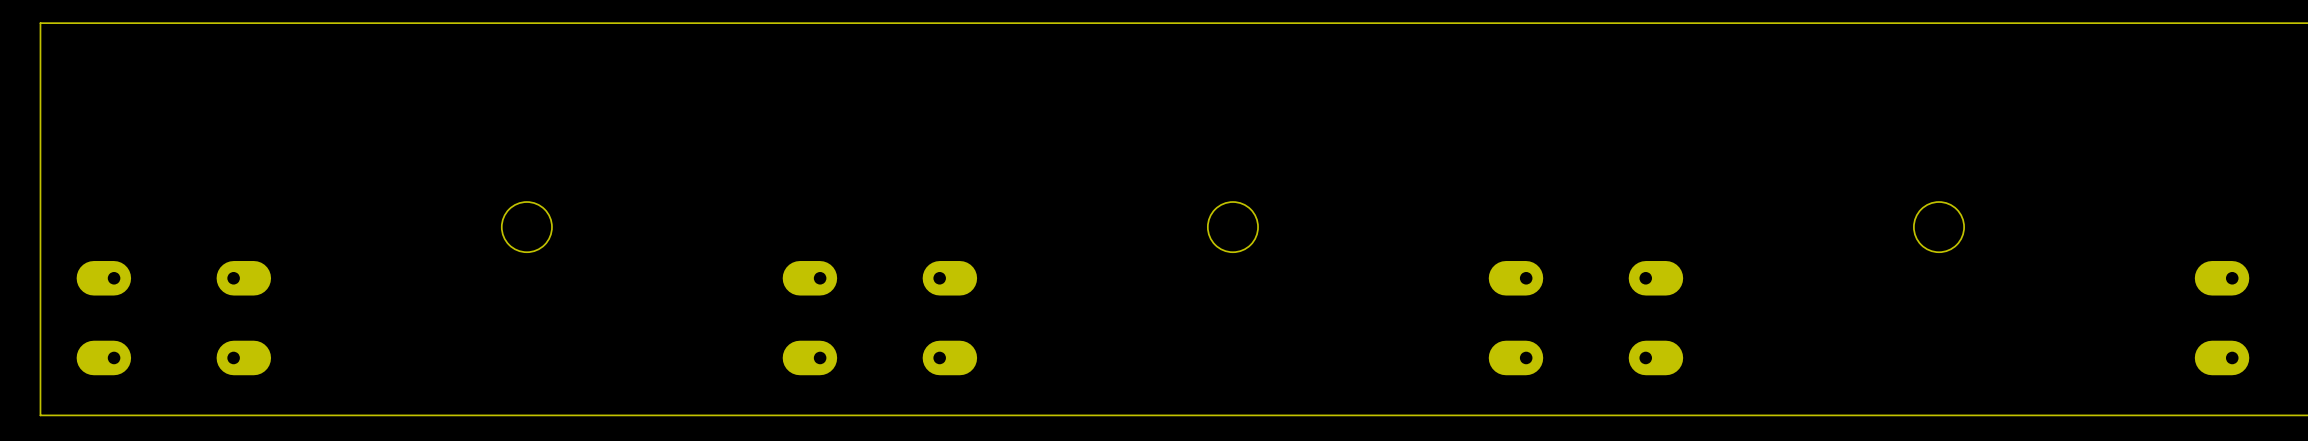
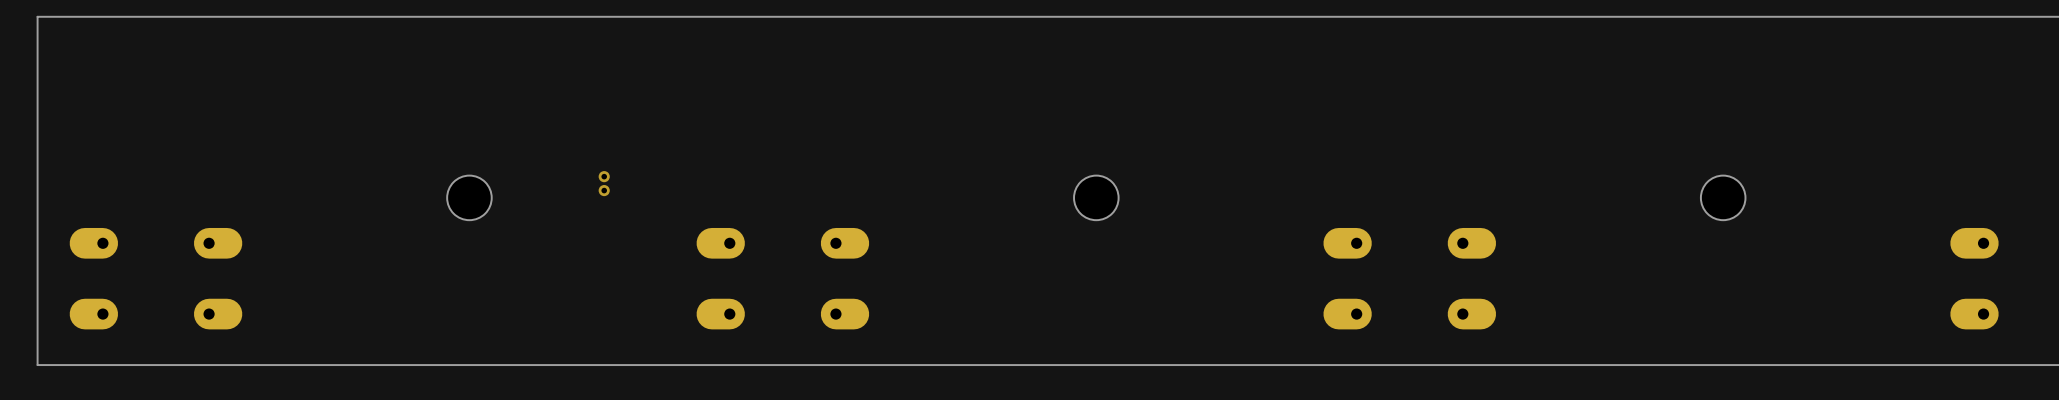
via: none -> (604, 176)
via: none -> (604, 190)

